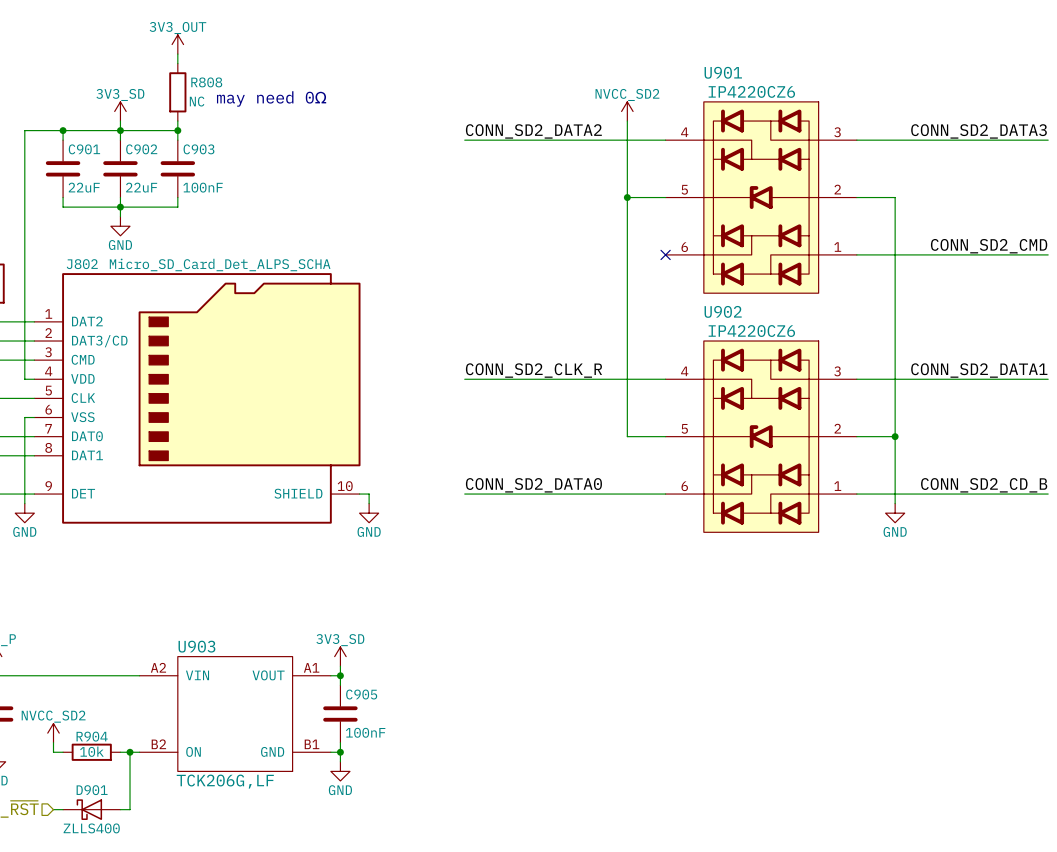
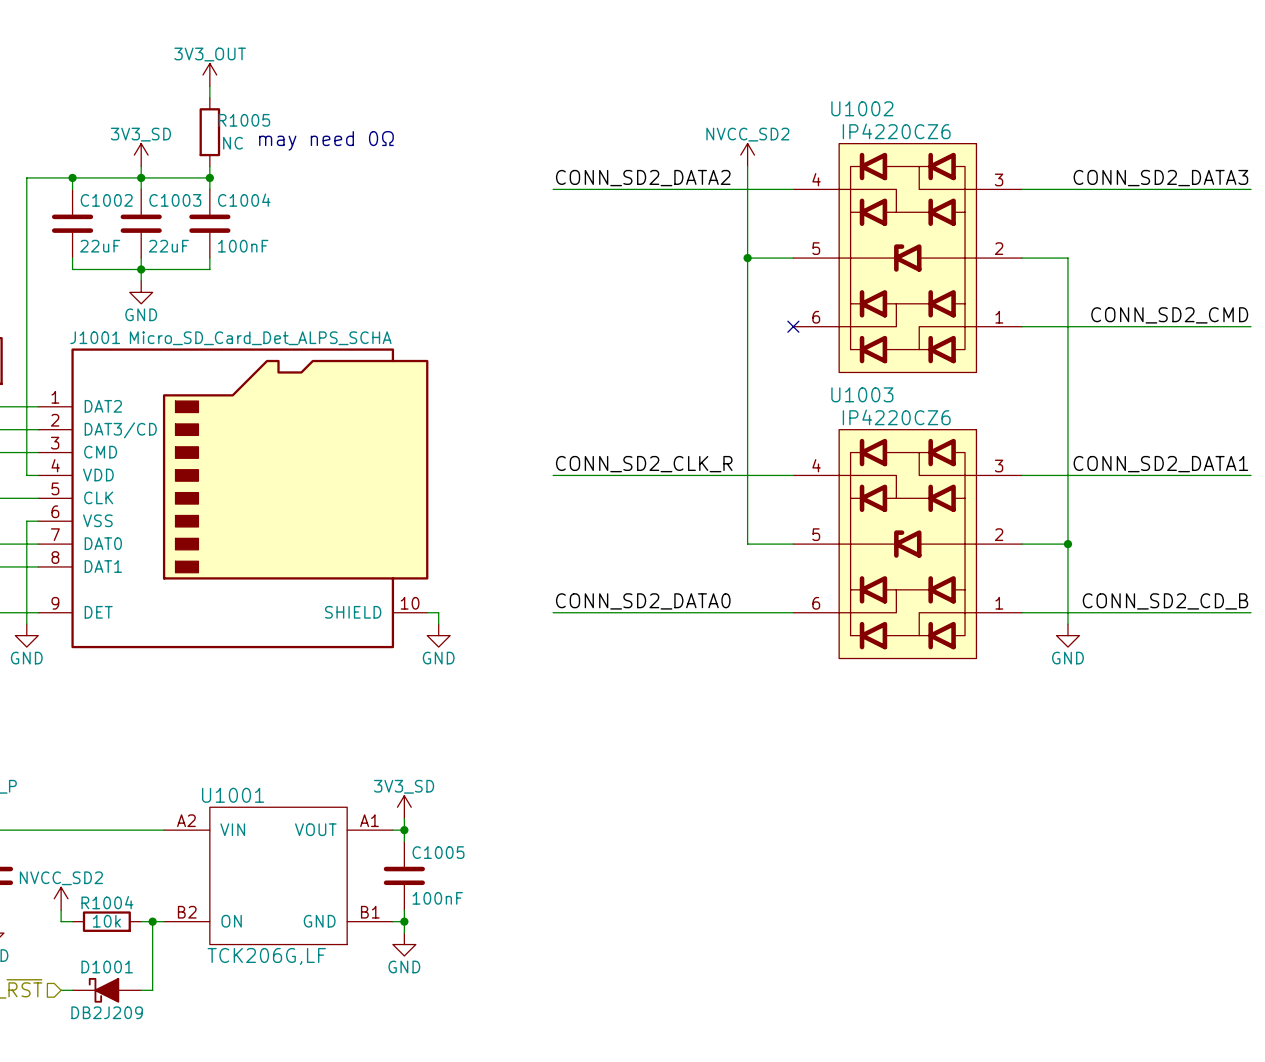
U901 name: U901 (723, 72) -> U1002 (862, 108)
R808 name: R808 (206, 82) -> R1005 (244, 120)
C901 name: C901 (84, 149) -> C1002 (106, 200)
C902 name: C902 (141, 149) -> C1003 (175, 200)
C903 name: C903 (198, 149) -> C1004 (244, 200)
J802 name: J802 (82, 264) -> J1001 (95, 337)
U902 name: U902 (723, 311) -> U1003 (862, 394)
U903 name: U903 (196, 646) -> U1001 (233, 795)
C905 name: C905 (361, 694) -> C1005 (438, 852)
R904 name: R904 (92, 736) -> R1004 (107, 902)
D901: ZLLS400 (91, 809) -> none
D1001: none -> DB2J209 (106, 990)

